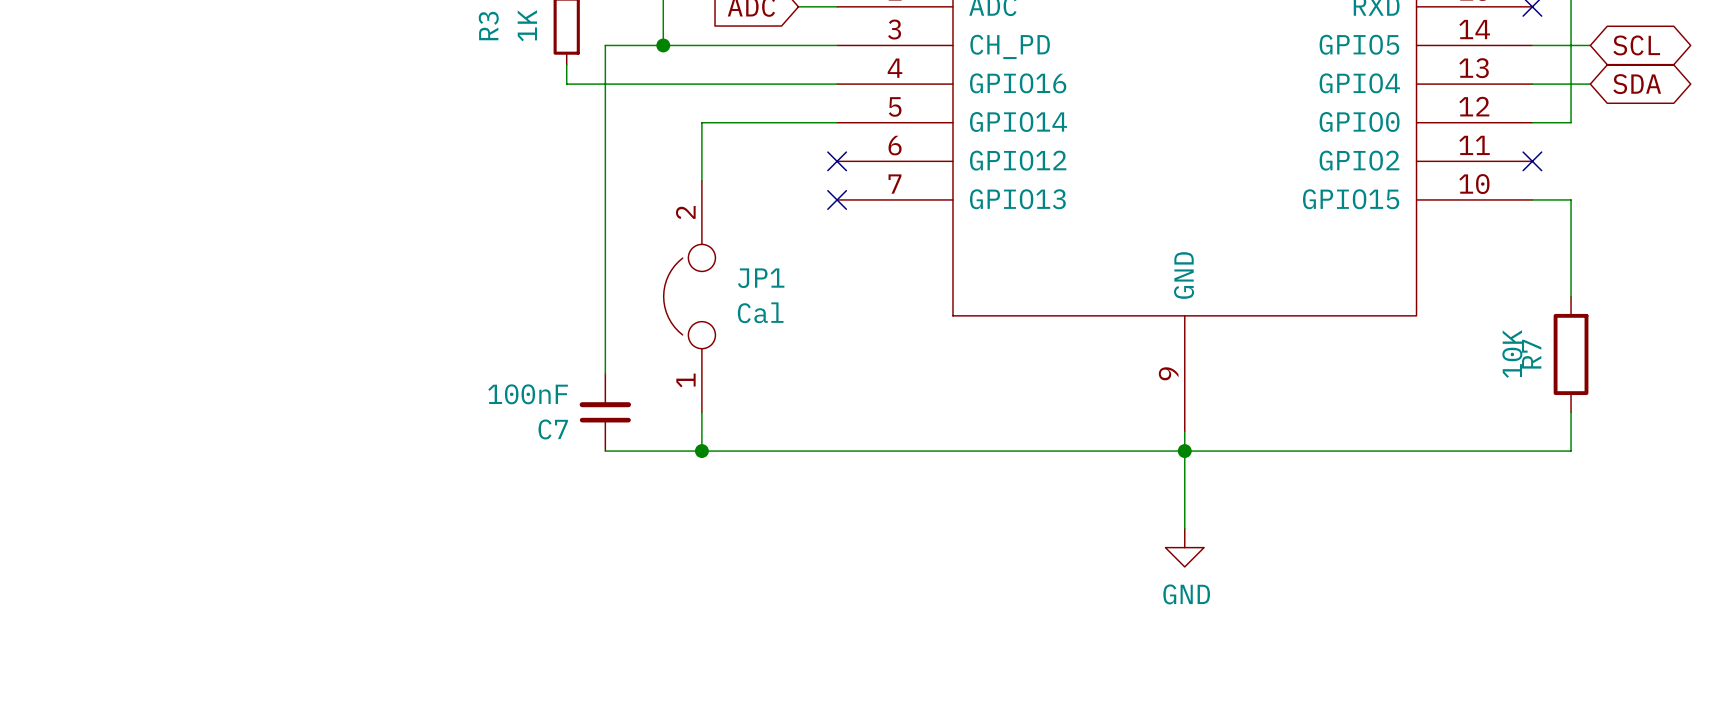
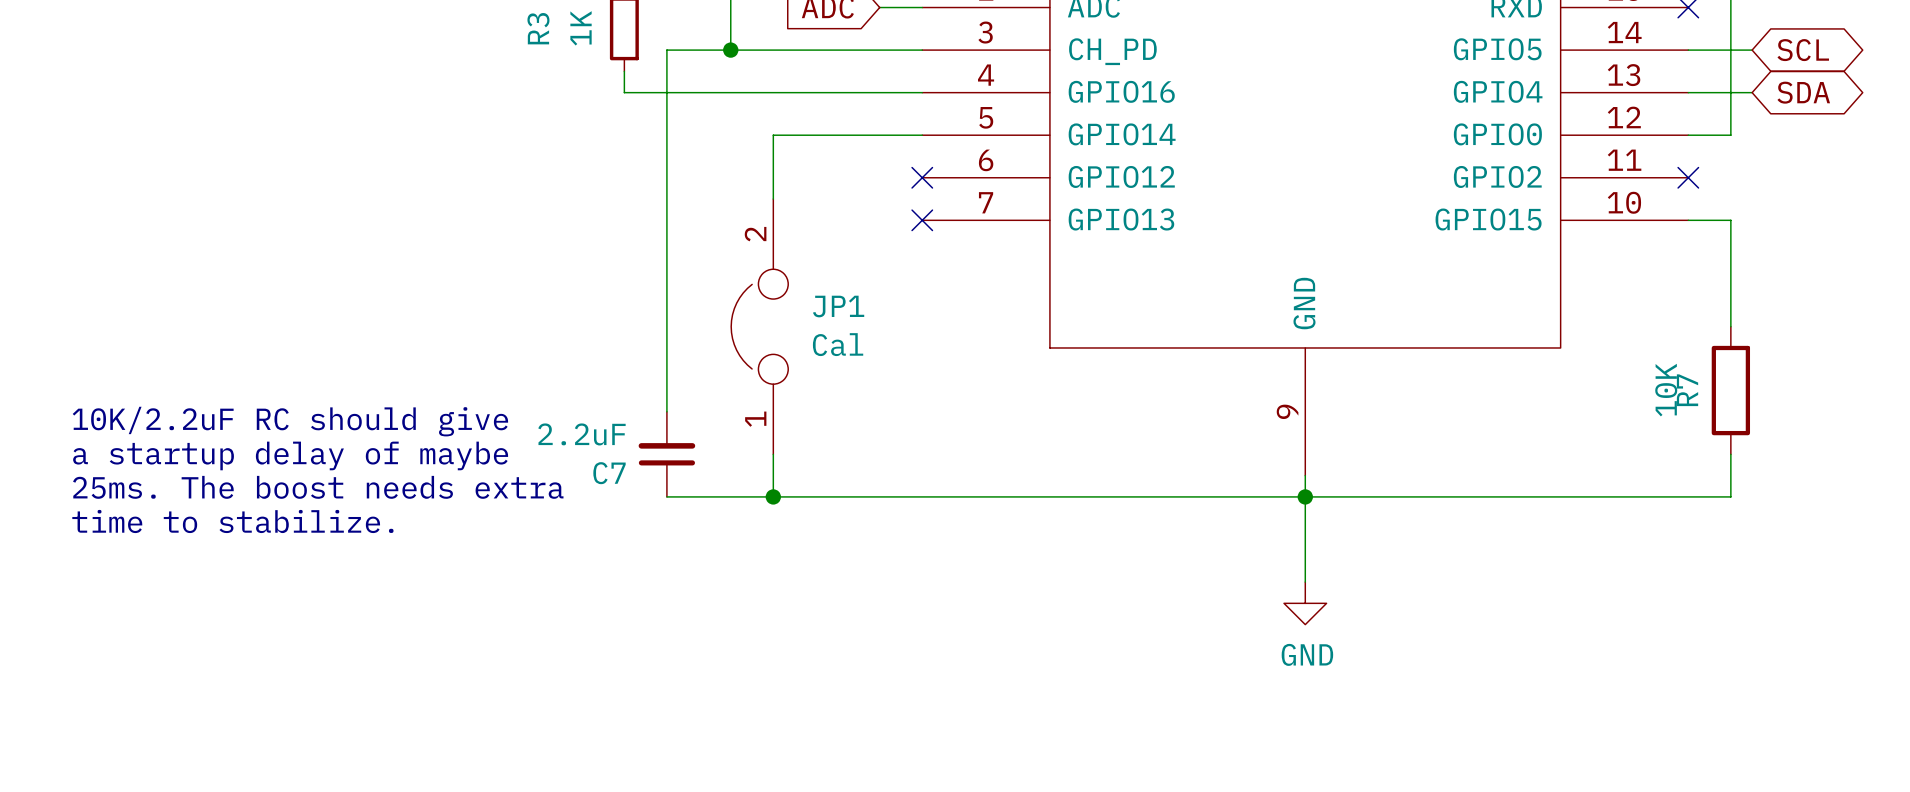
text: none -> 10K/2.2uF RC should give (290, 421)
C7 value: 100nF (528, 394) -> 2.2uF (581, 434)
text: none -> a startup delay of maybe (290, 455)
text: none -> 25ms. The boost needs extra (318, 487)
text: none -> time to stabilize. (232, 521)

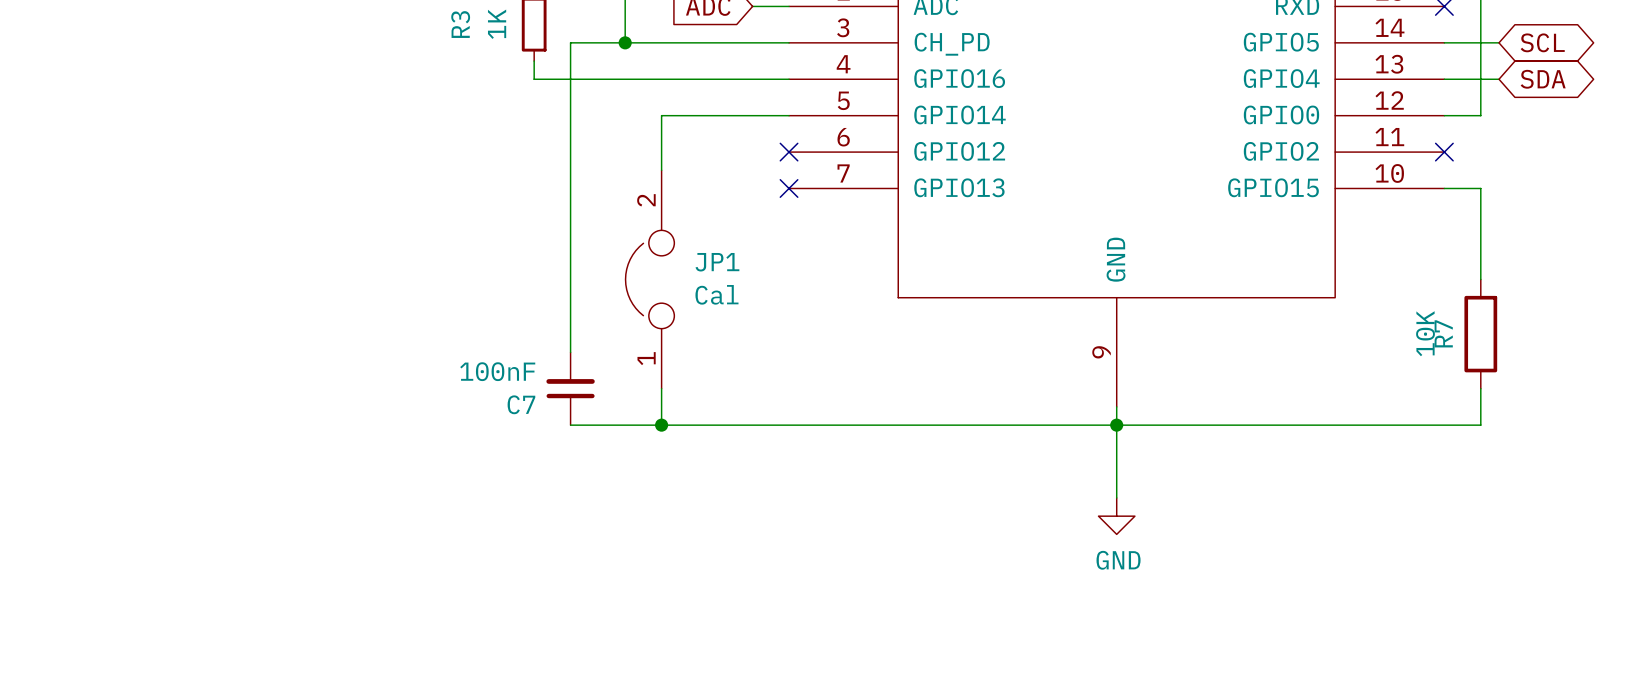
text: 10K/2.2uF RC should give (290, 421) -> none
C7 value: 2.2uF (581, 434) -> 100nF (497, 371)
text: a startup delay of maybe (290, 455) -> none
text: 25ms. The boost needs extra (318, 487) -> none
text: time to stabilize. (232, 521) -> none

